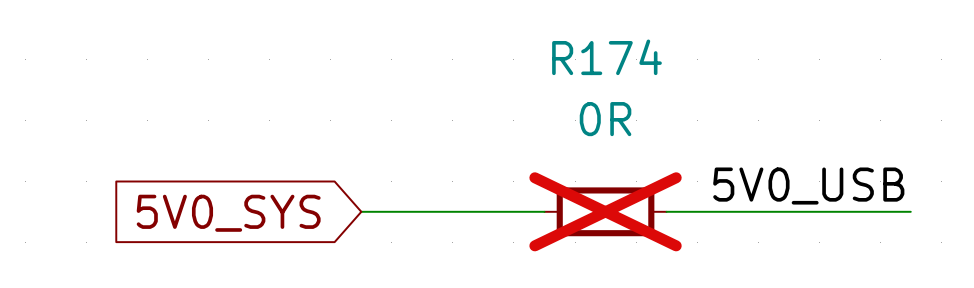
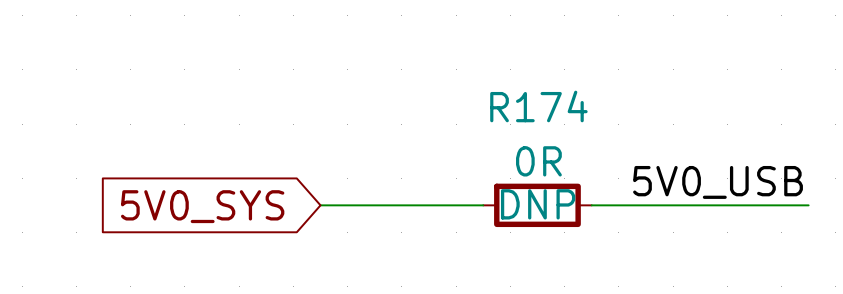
R174 name position: R174 (606, 57) -> R174 (538, 106)
R174 text position: 0R (605, 119) -> 0R (538, 161)
R174 text: none -> DNP (538, 204)
R174 do-not-place cross: (605, 211) -> none

